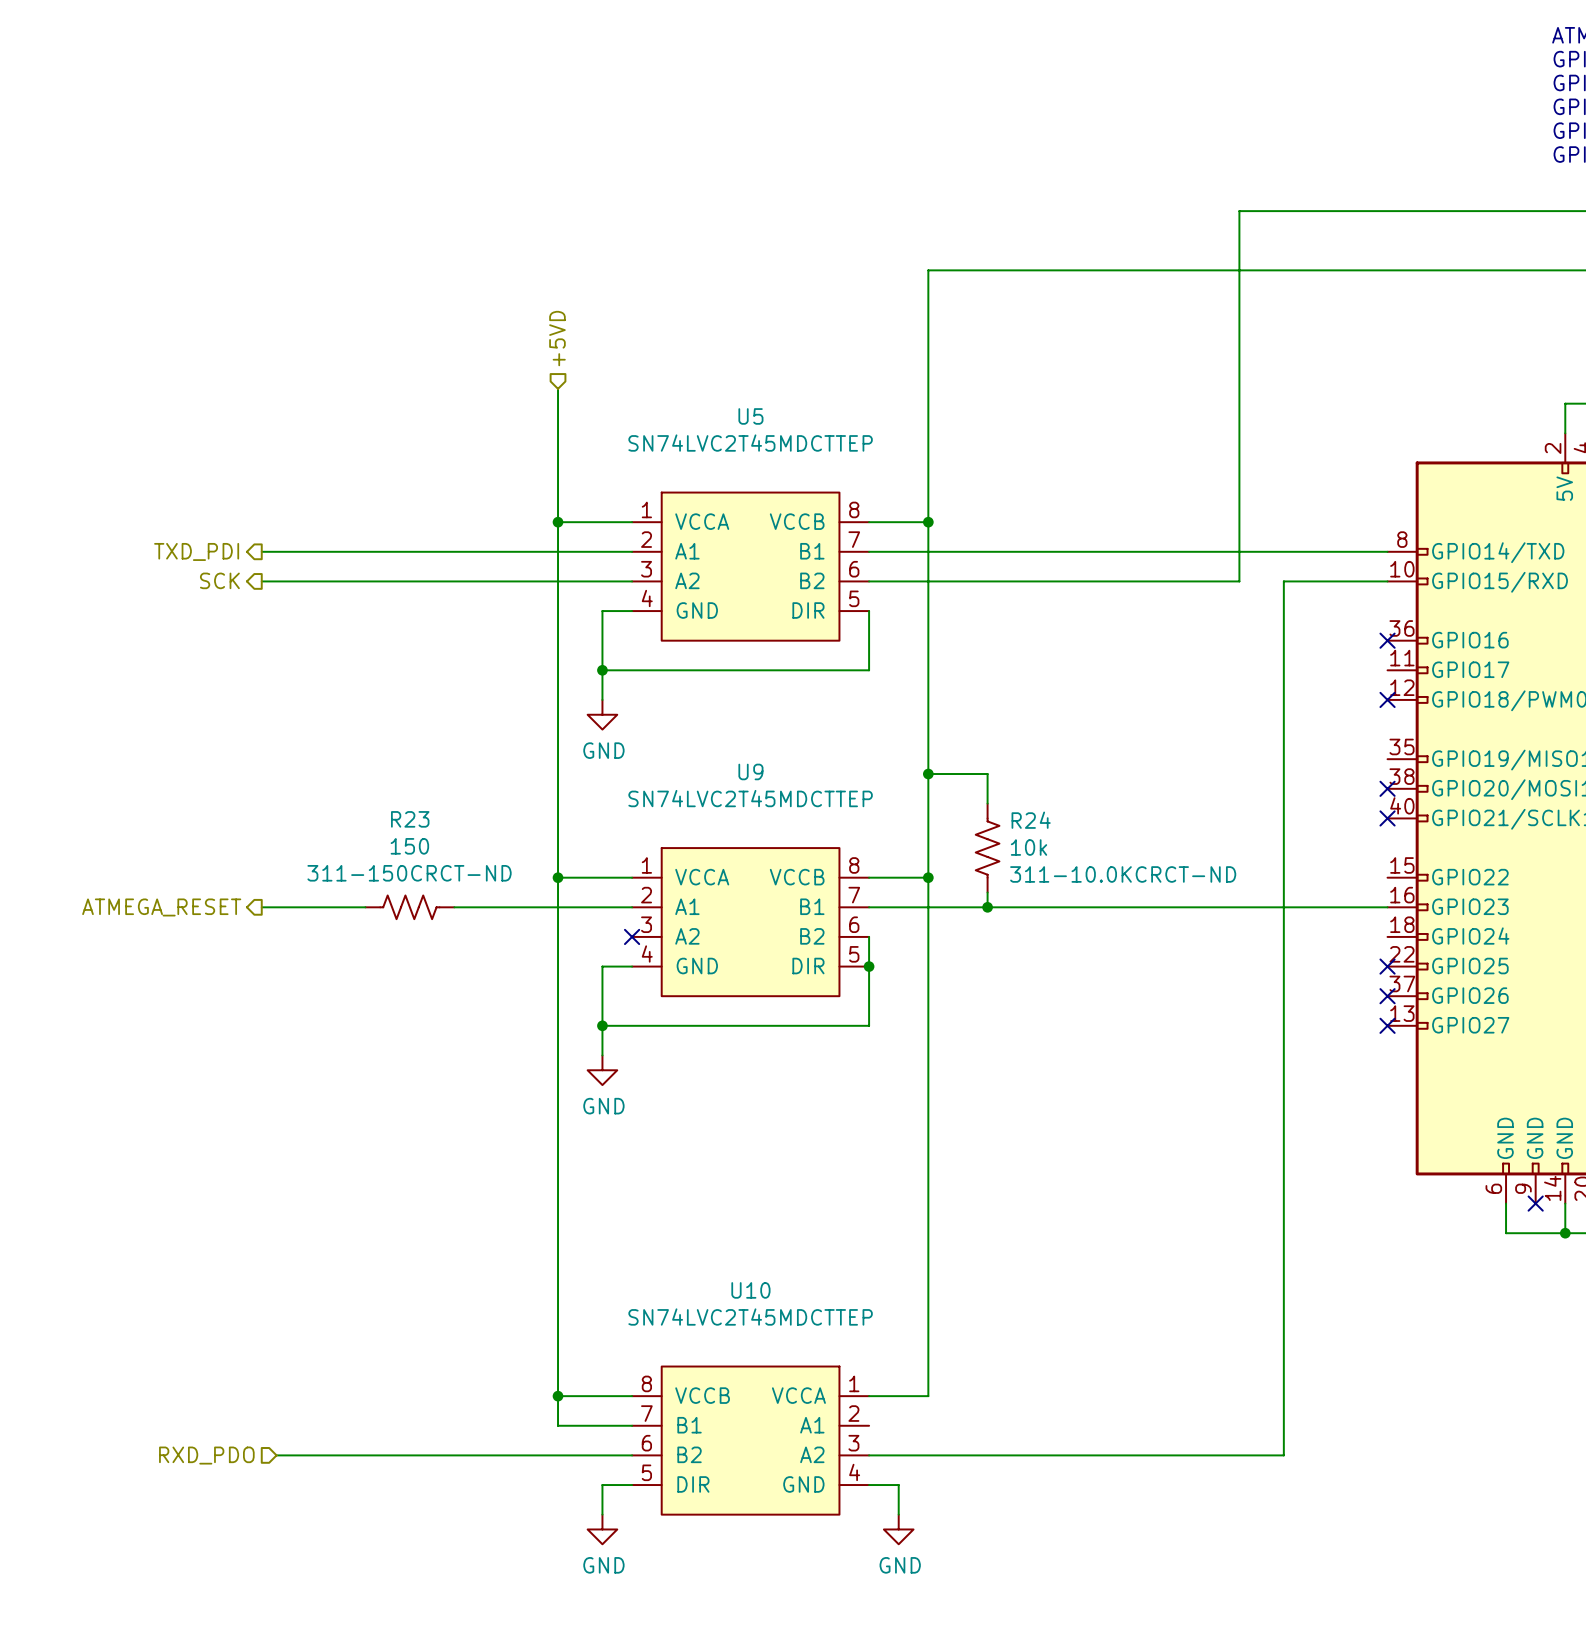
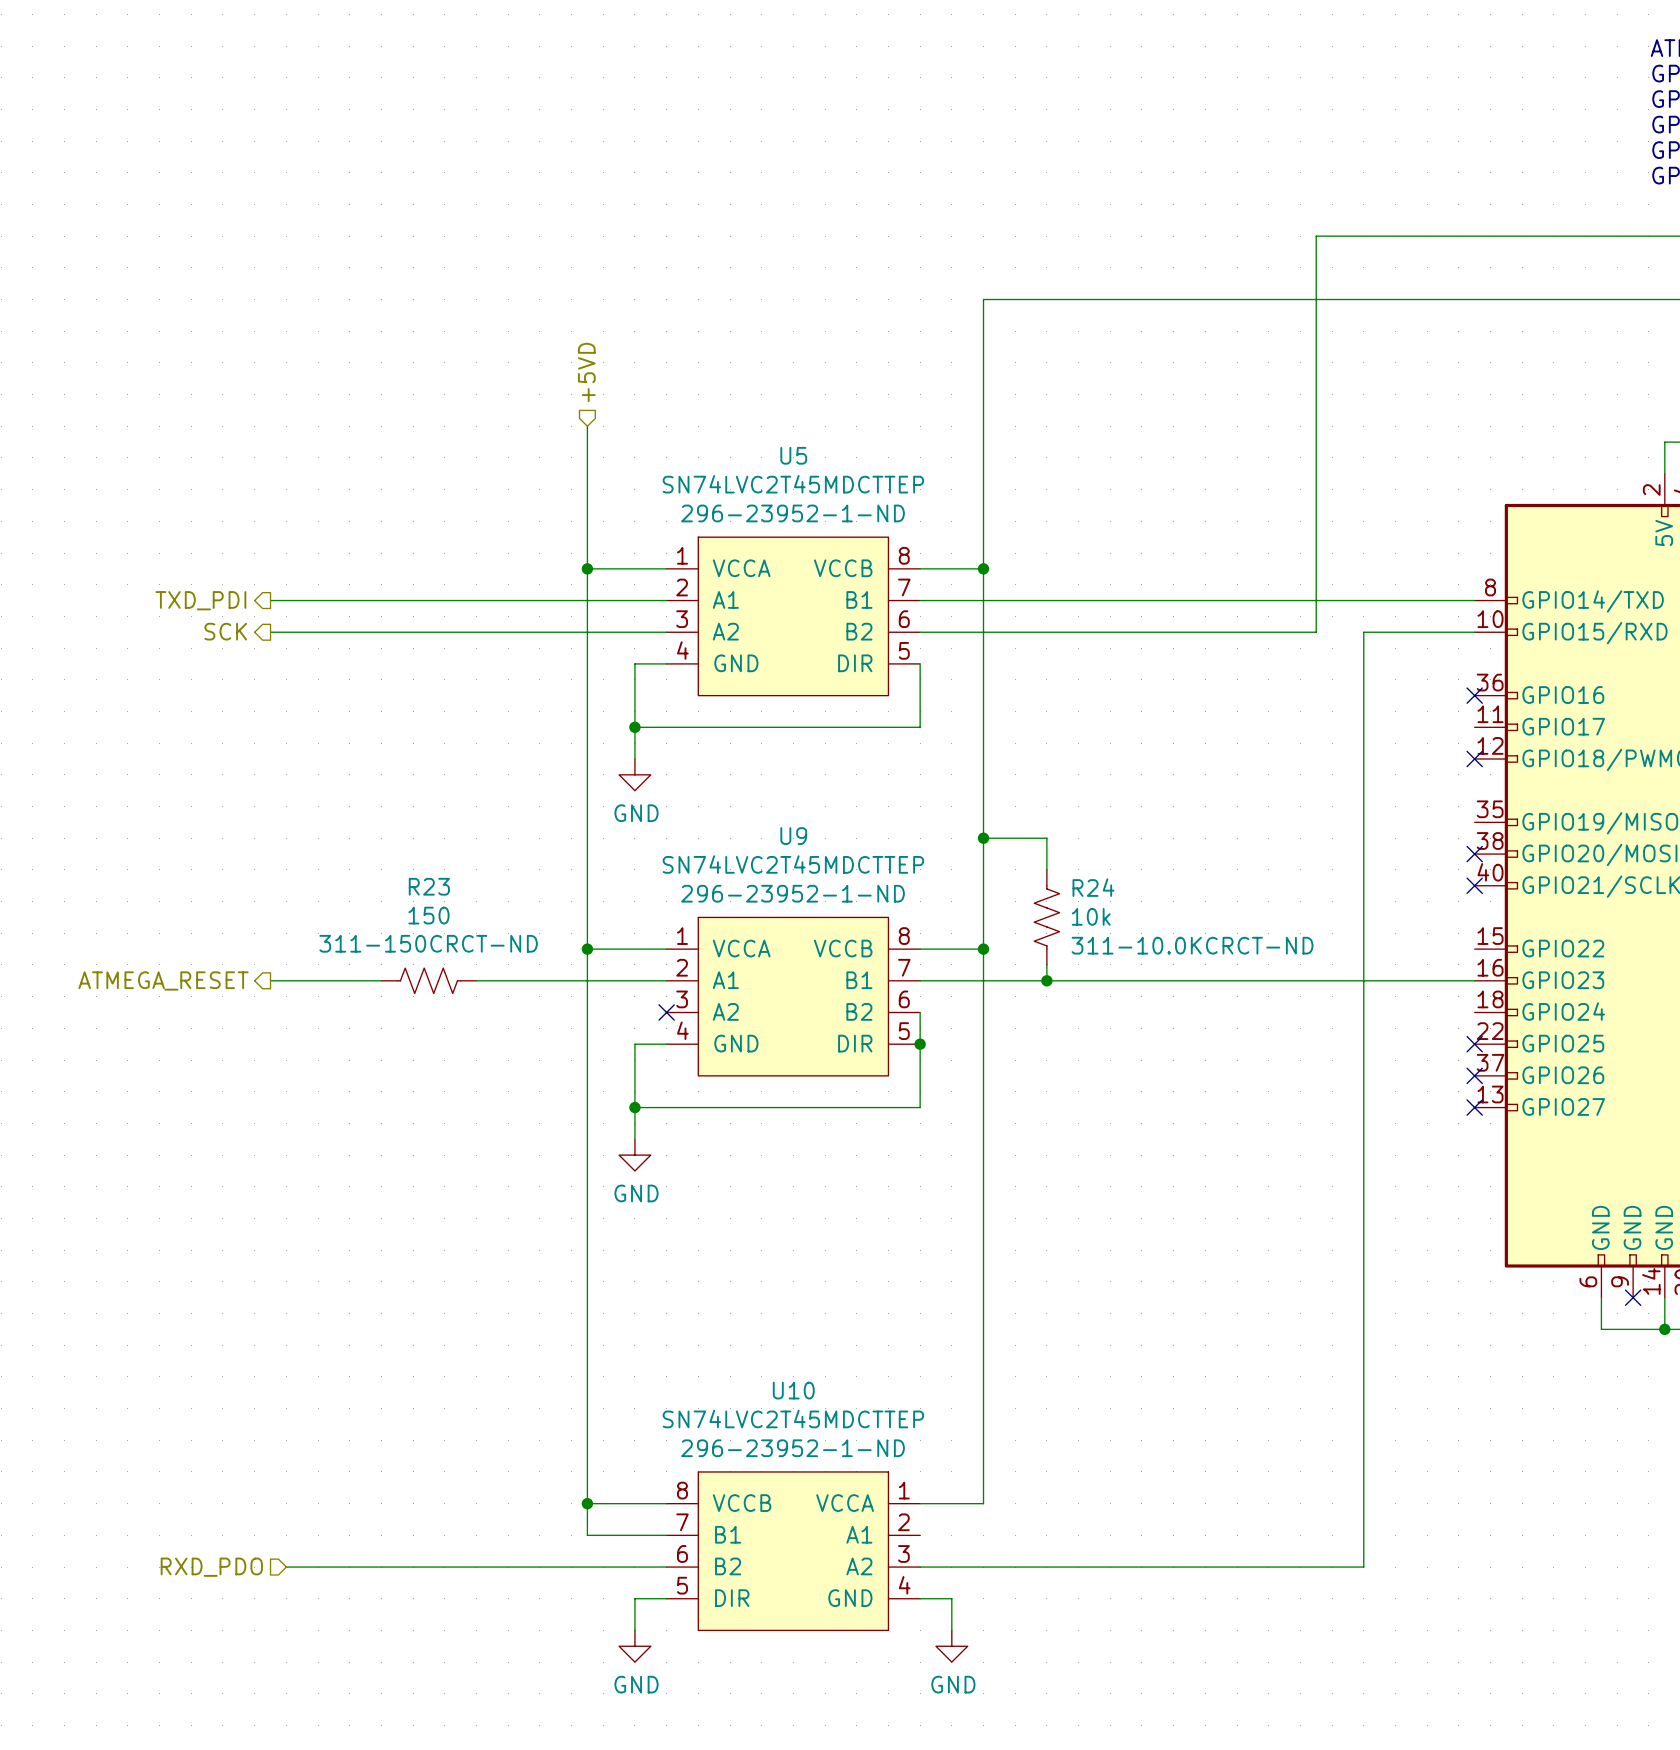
U5 text: none -> 296-23952-1-ND (793, 513)
U9 text: none -> 296-23952-1-ND (793, 893)
R23 text: none -> 311-150CRCT-ND (428, 943)
R23 text: 311-150CRCT-ND (409, 873) -> none
R24 text: none -> 311-10.0KCRCT-ND (1192, 945)
R24 text: 311-10.0KCRCT-ND (1123, 874) -> none
U10 text: none -> 296-23952-1-ND (793, 1448)

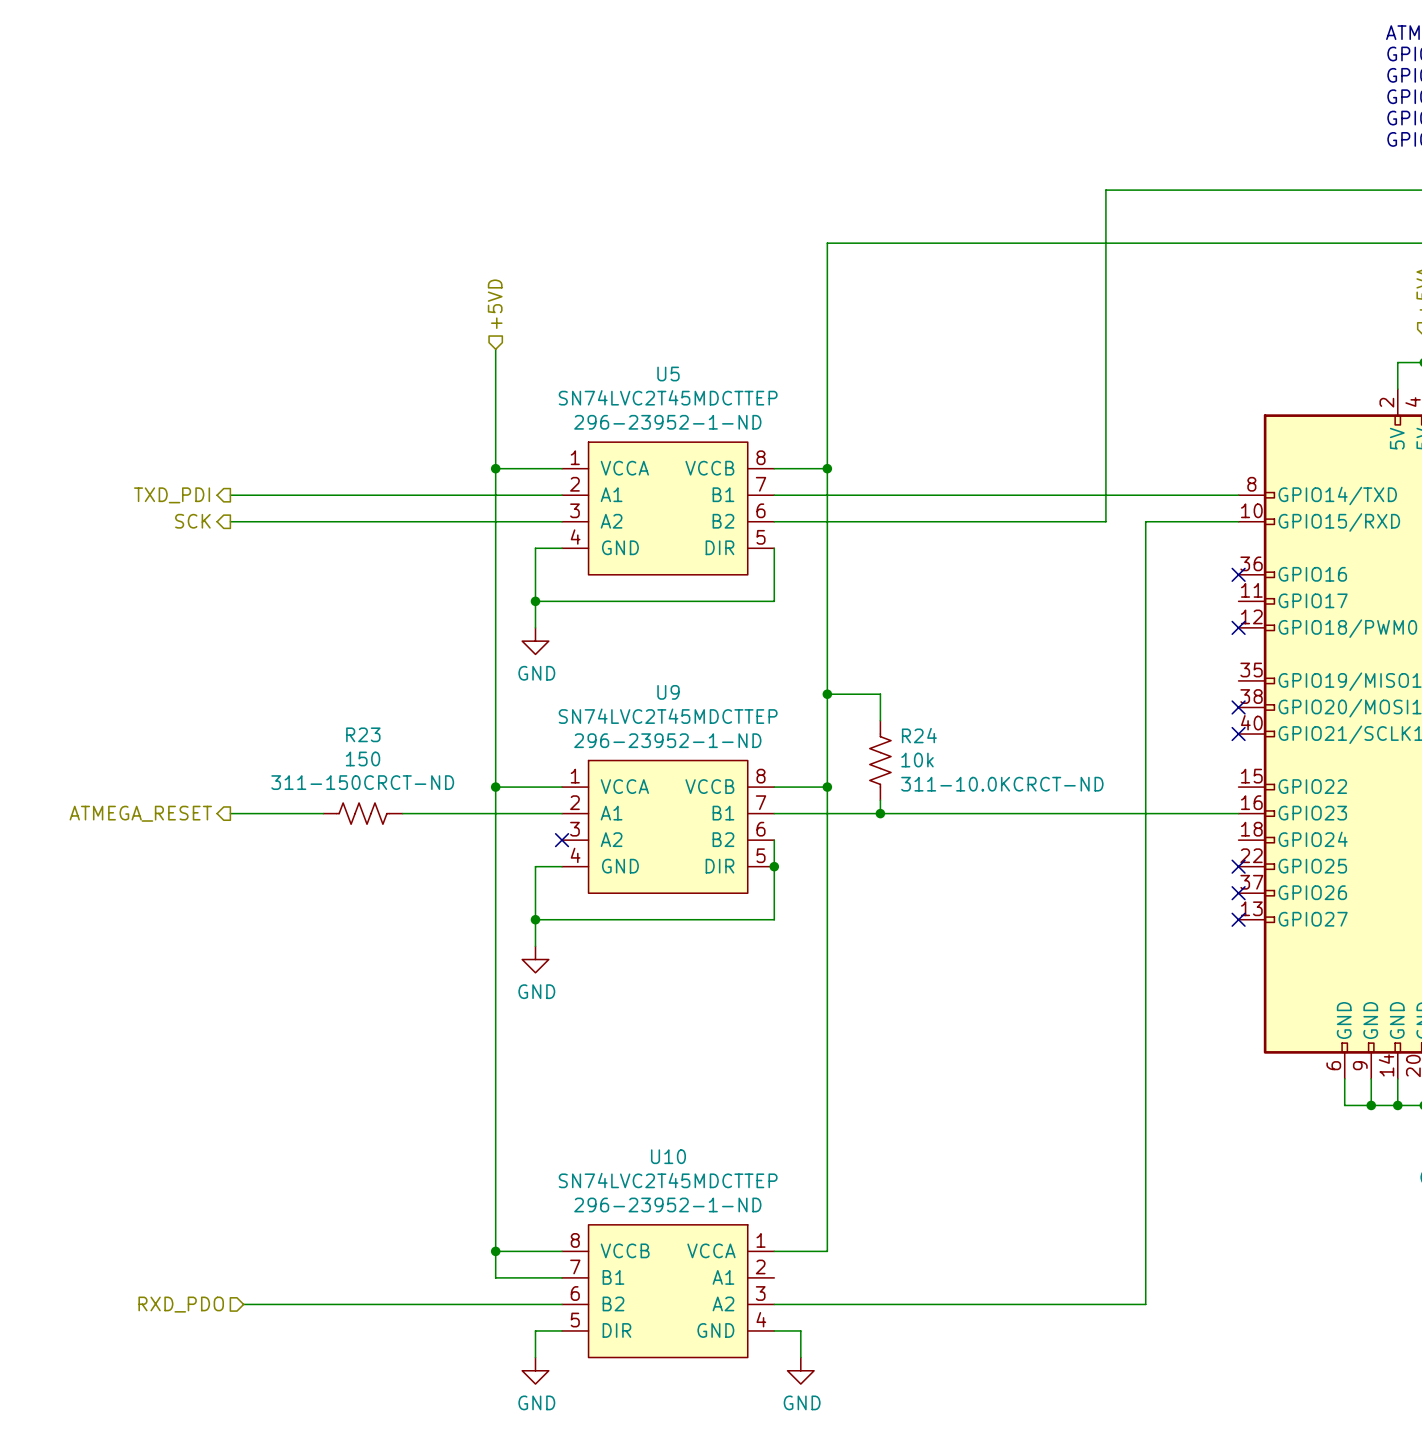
wire: none -> (1371, 1078) (1371, 1105)
no-connect mark: (1633, 1297) -> none
junction: none -> (1371, 1105)

